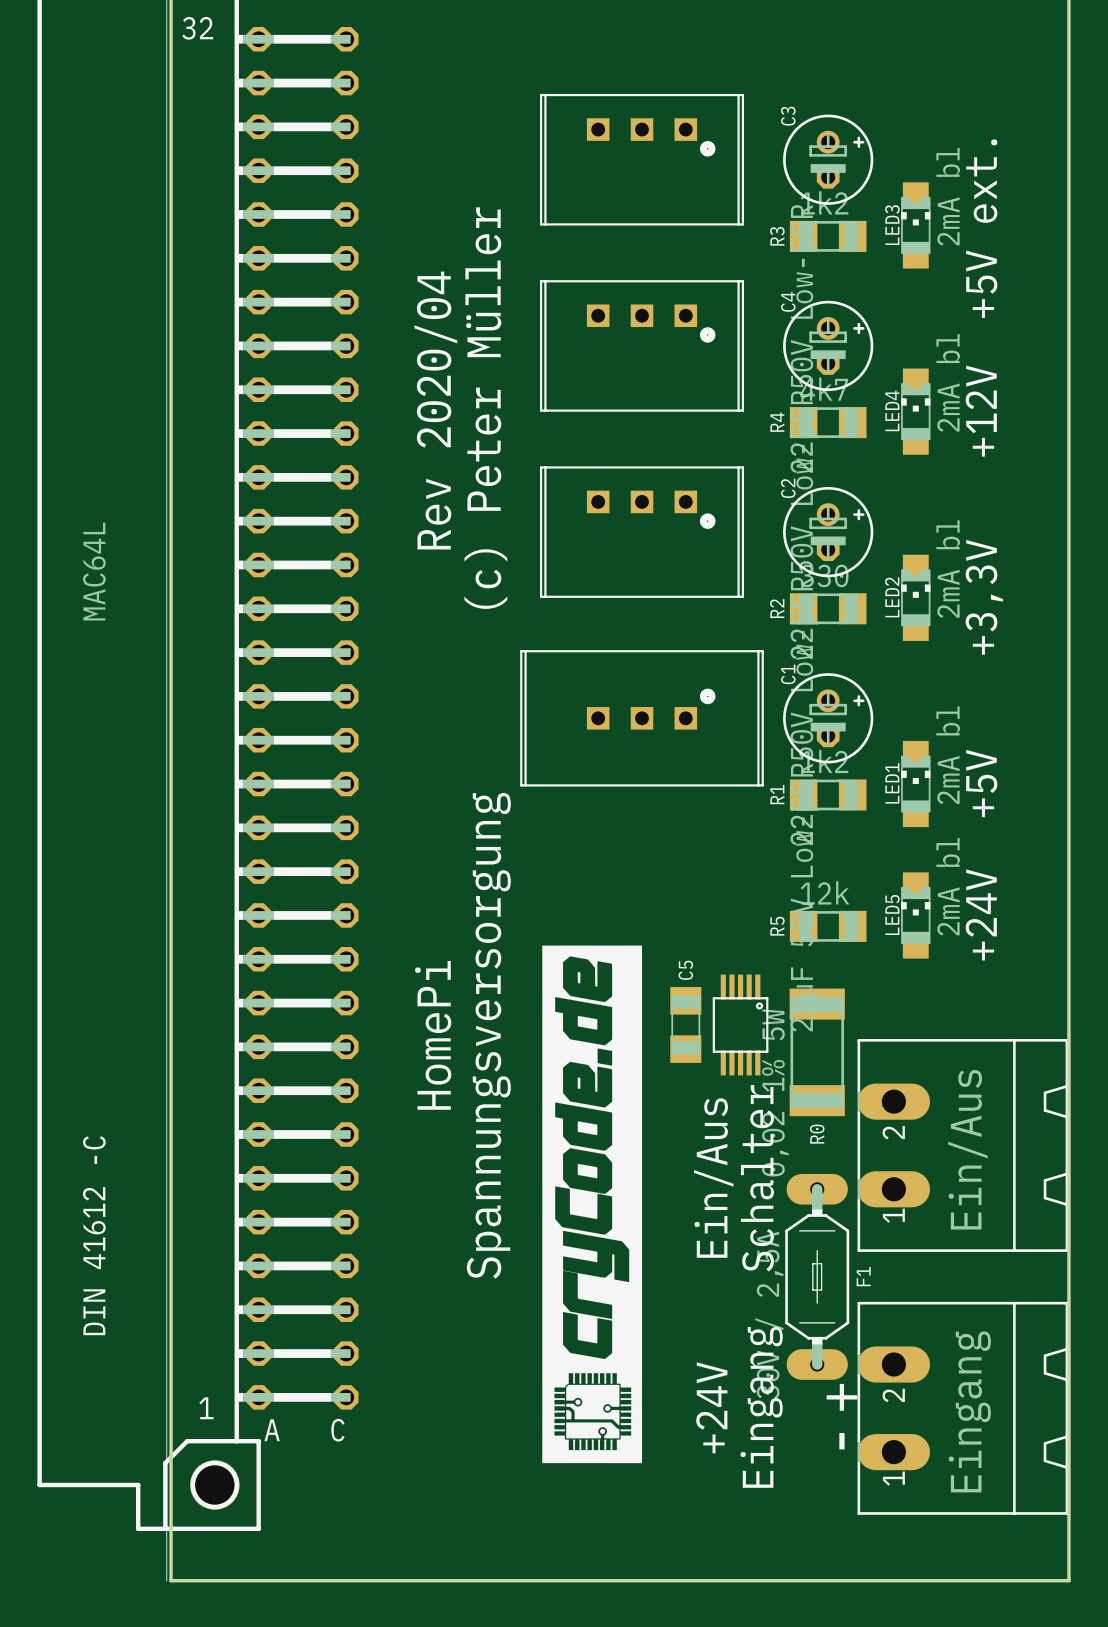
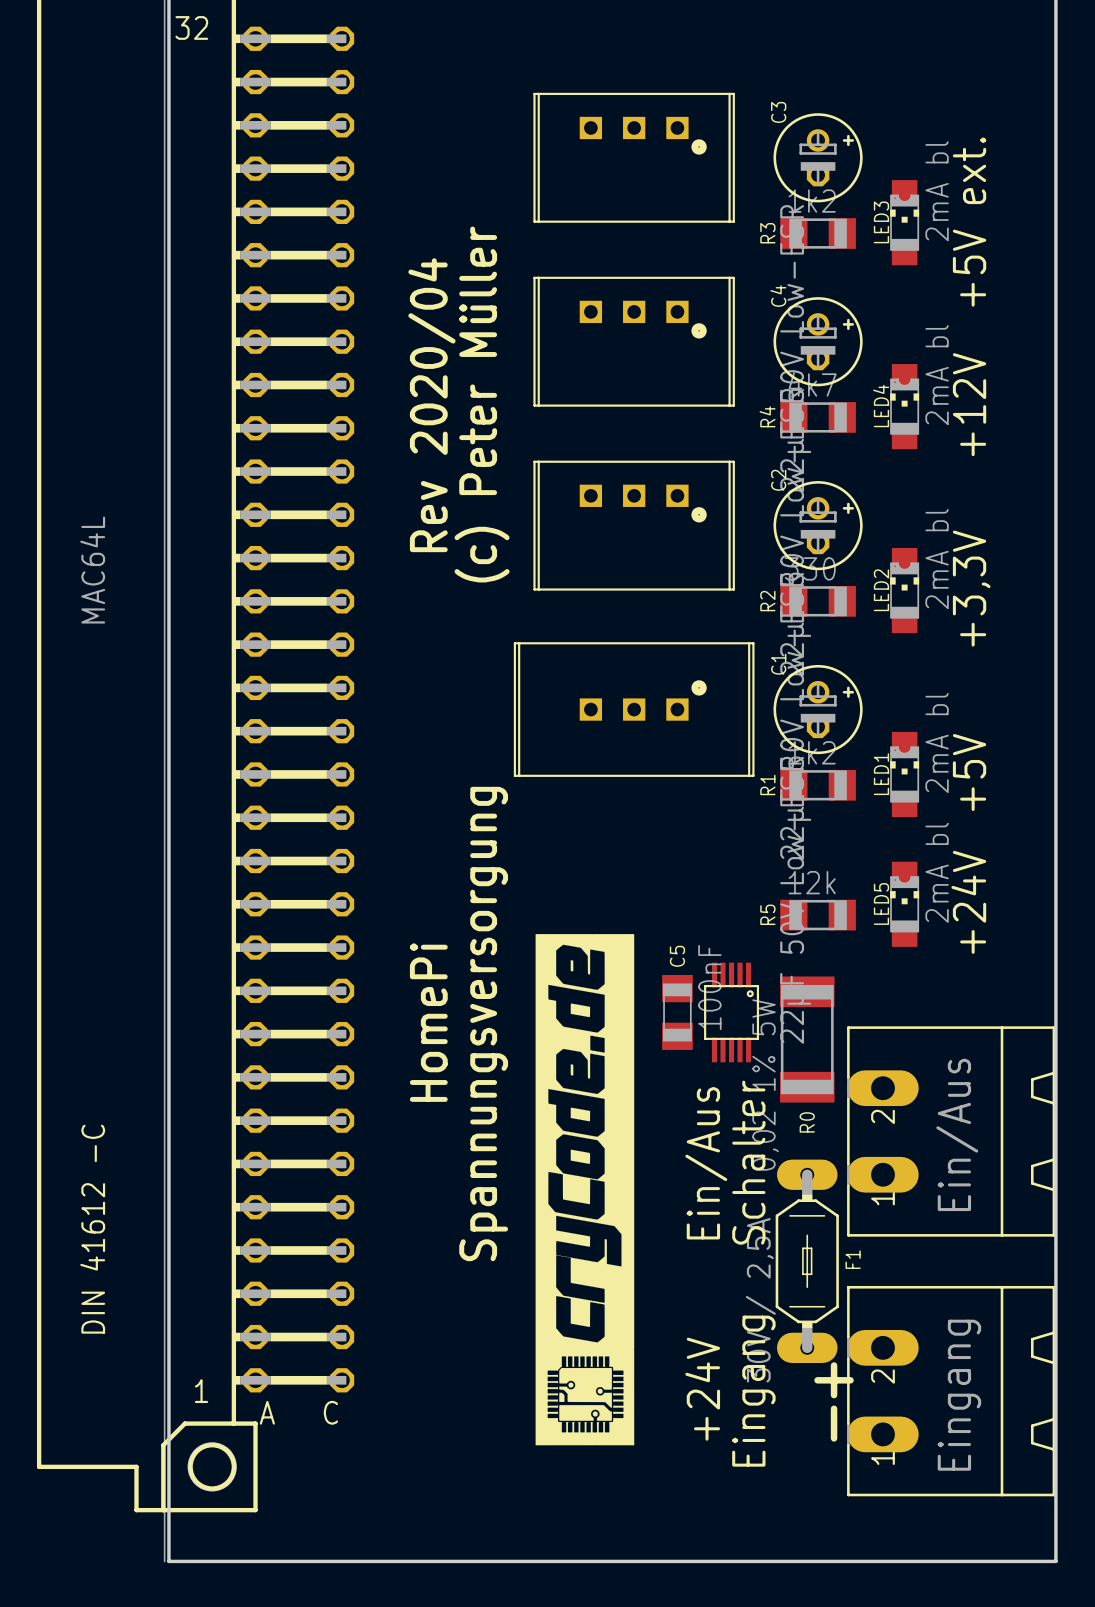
C5 value: none -> 100nF (709, 987)

